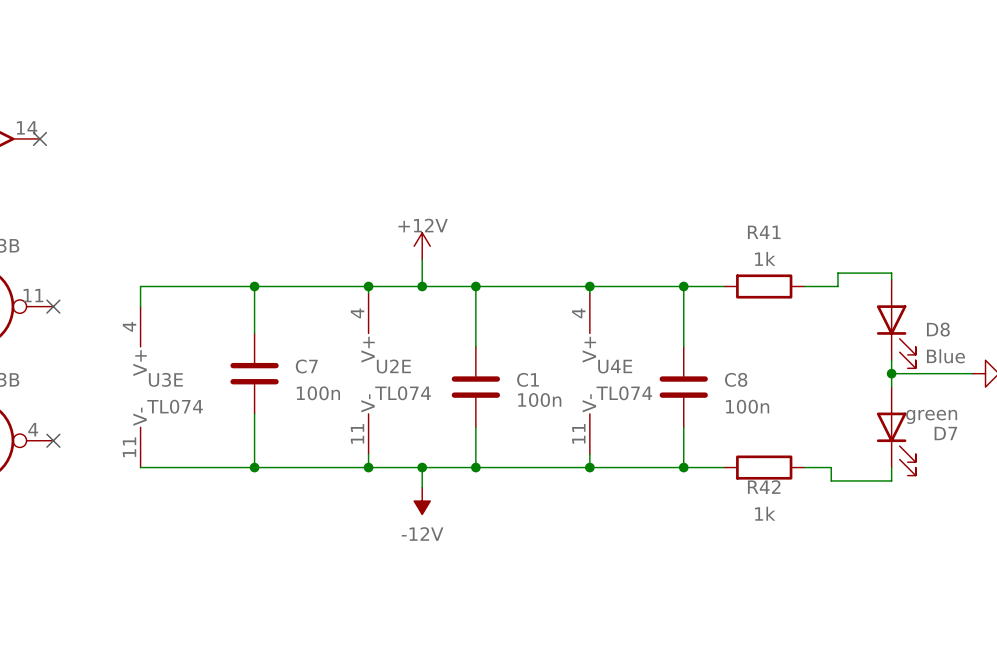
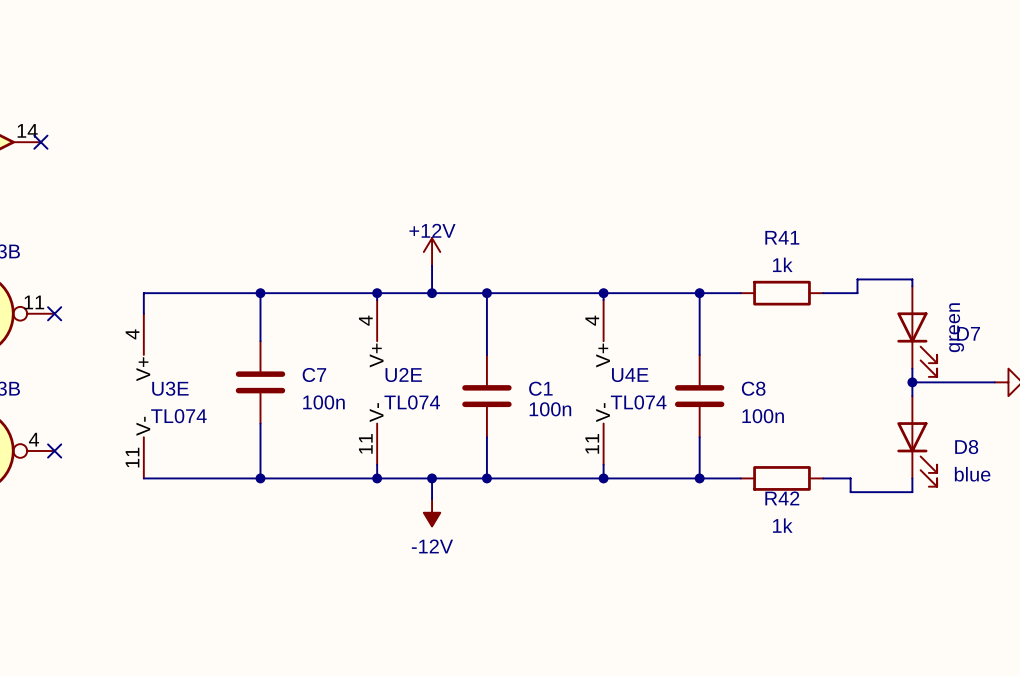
D8 name: D8 (938, 329) -> D7 (968, 333)
D8 value: Blue (945, 356) -> green (956, 327)
D7 value: green (931, 416) -> blue (972, 474)
D7 name: D7 (945, 433) -> D8 (966, 447)

